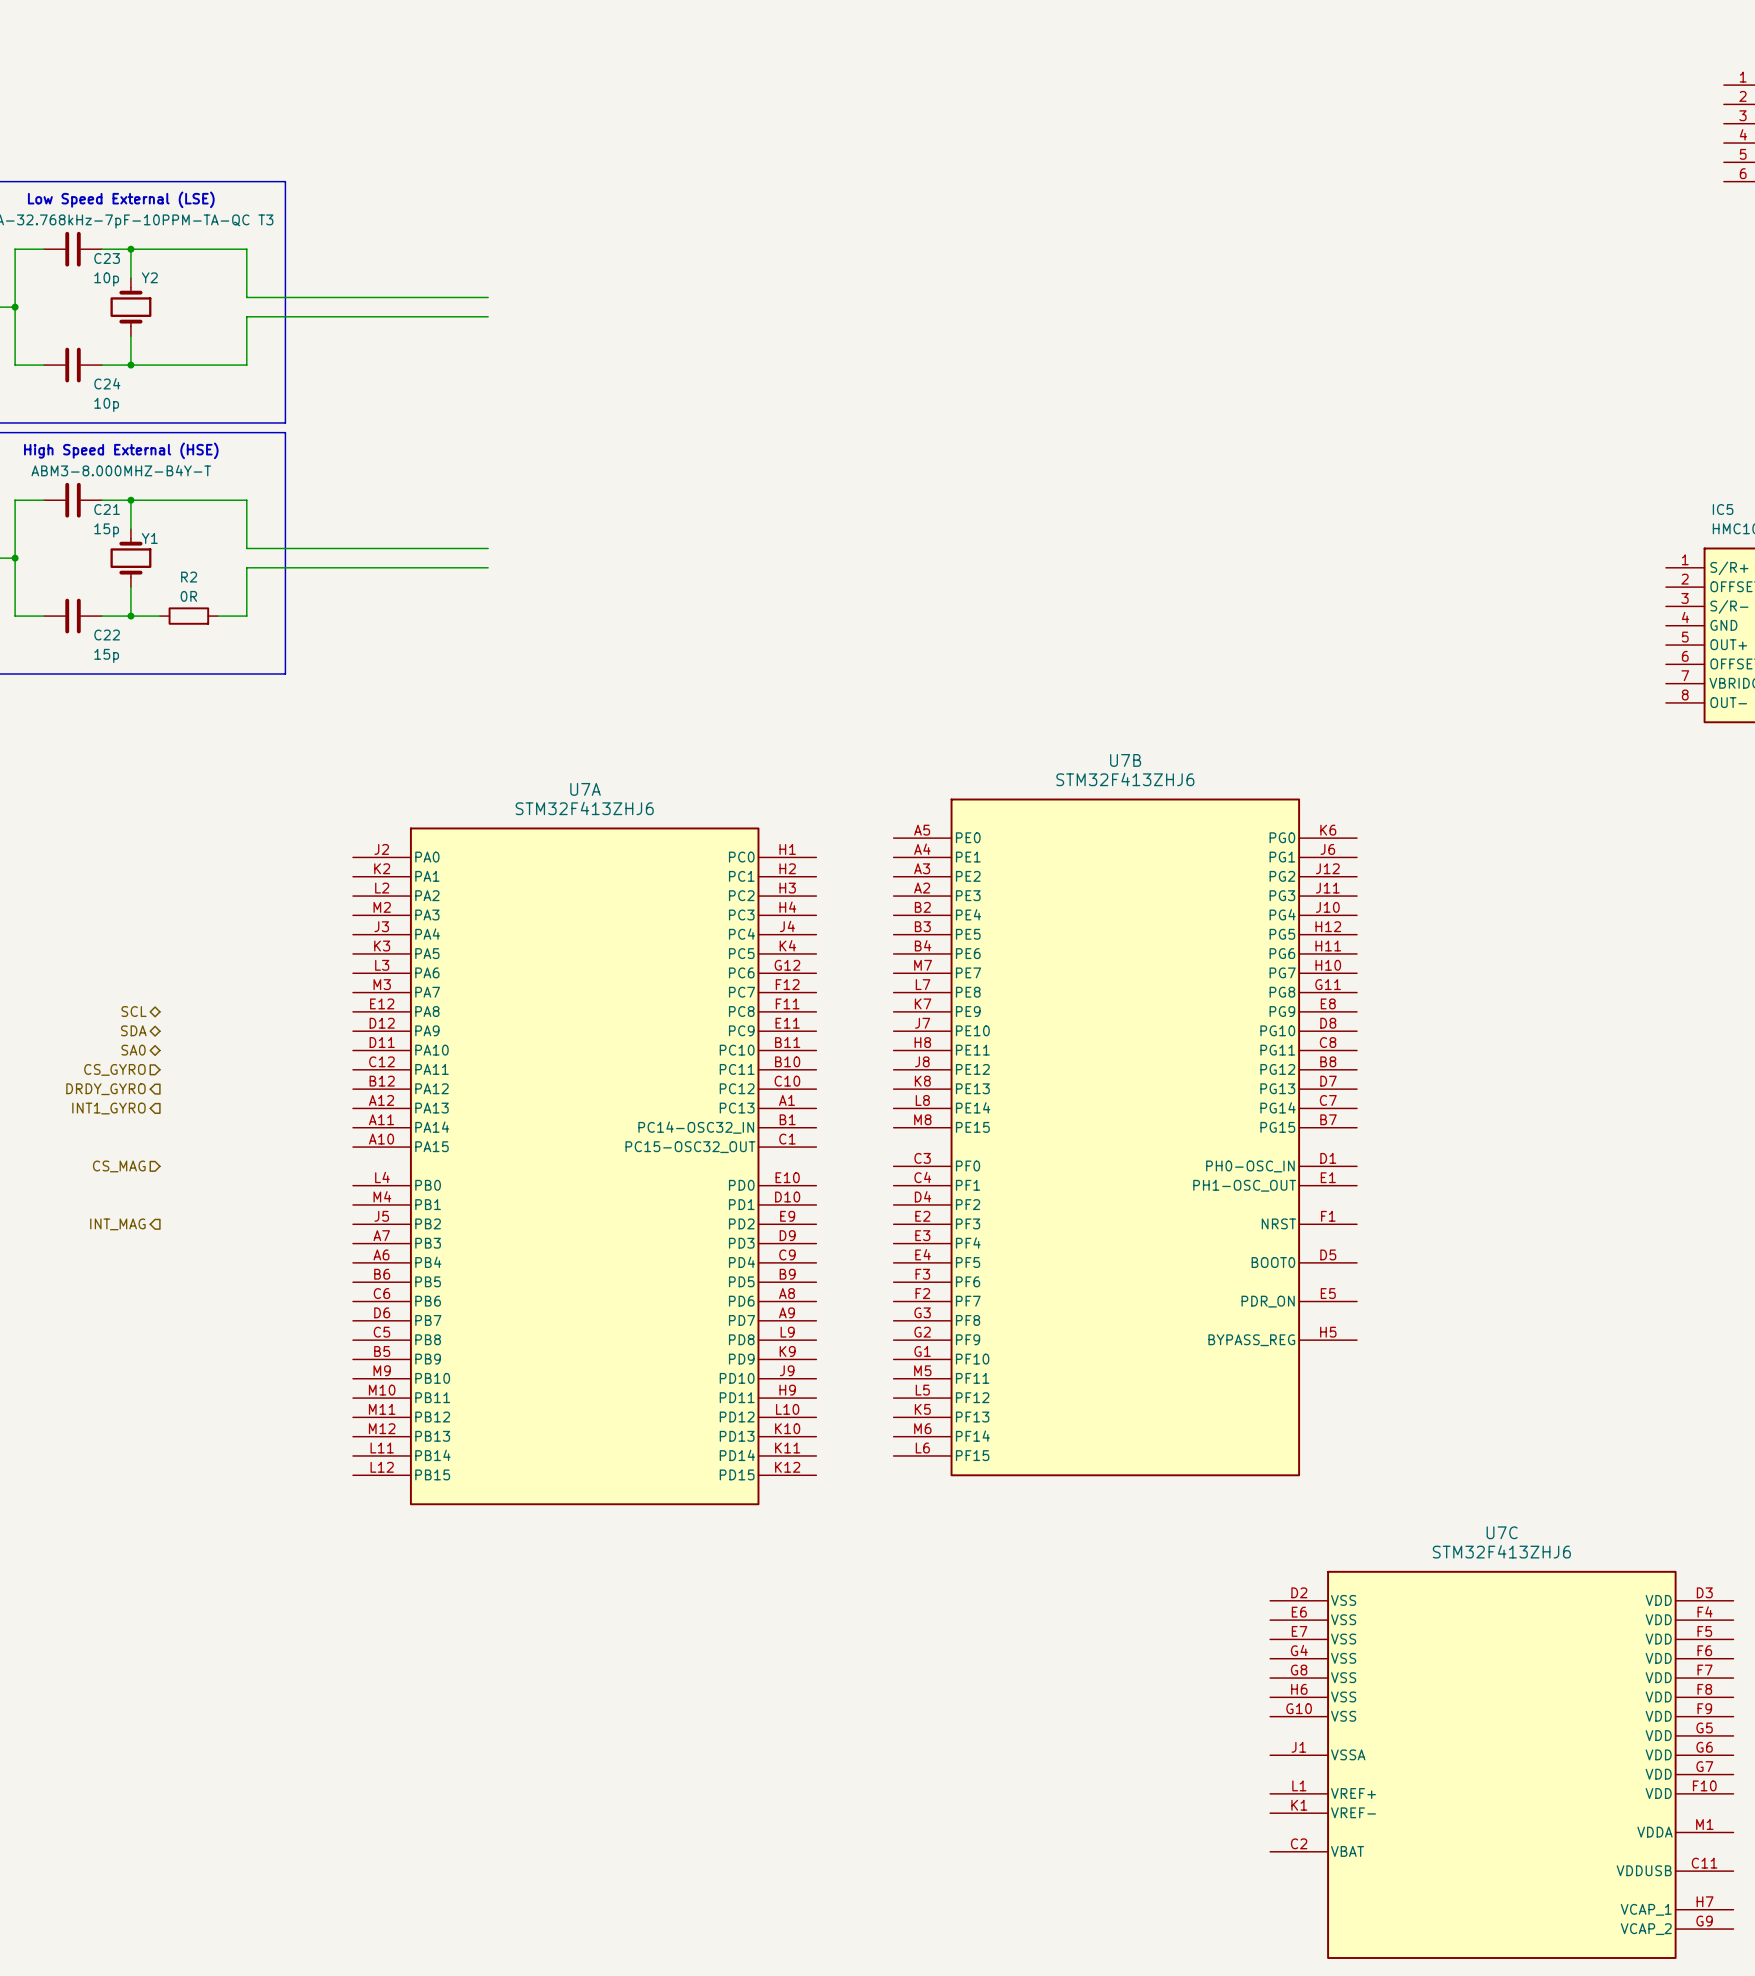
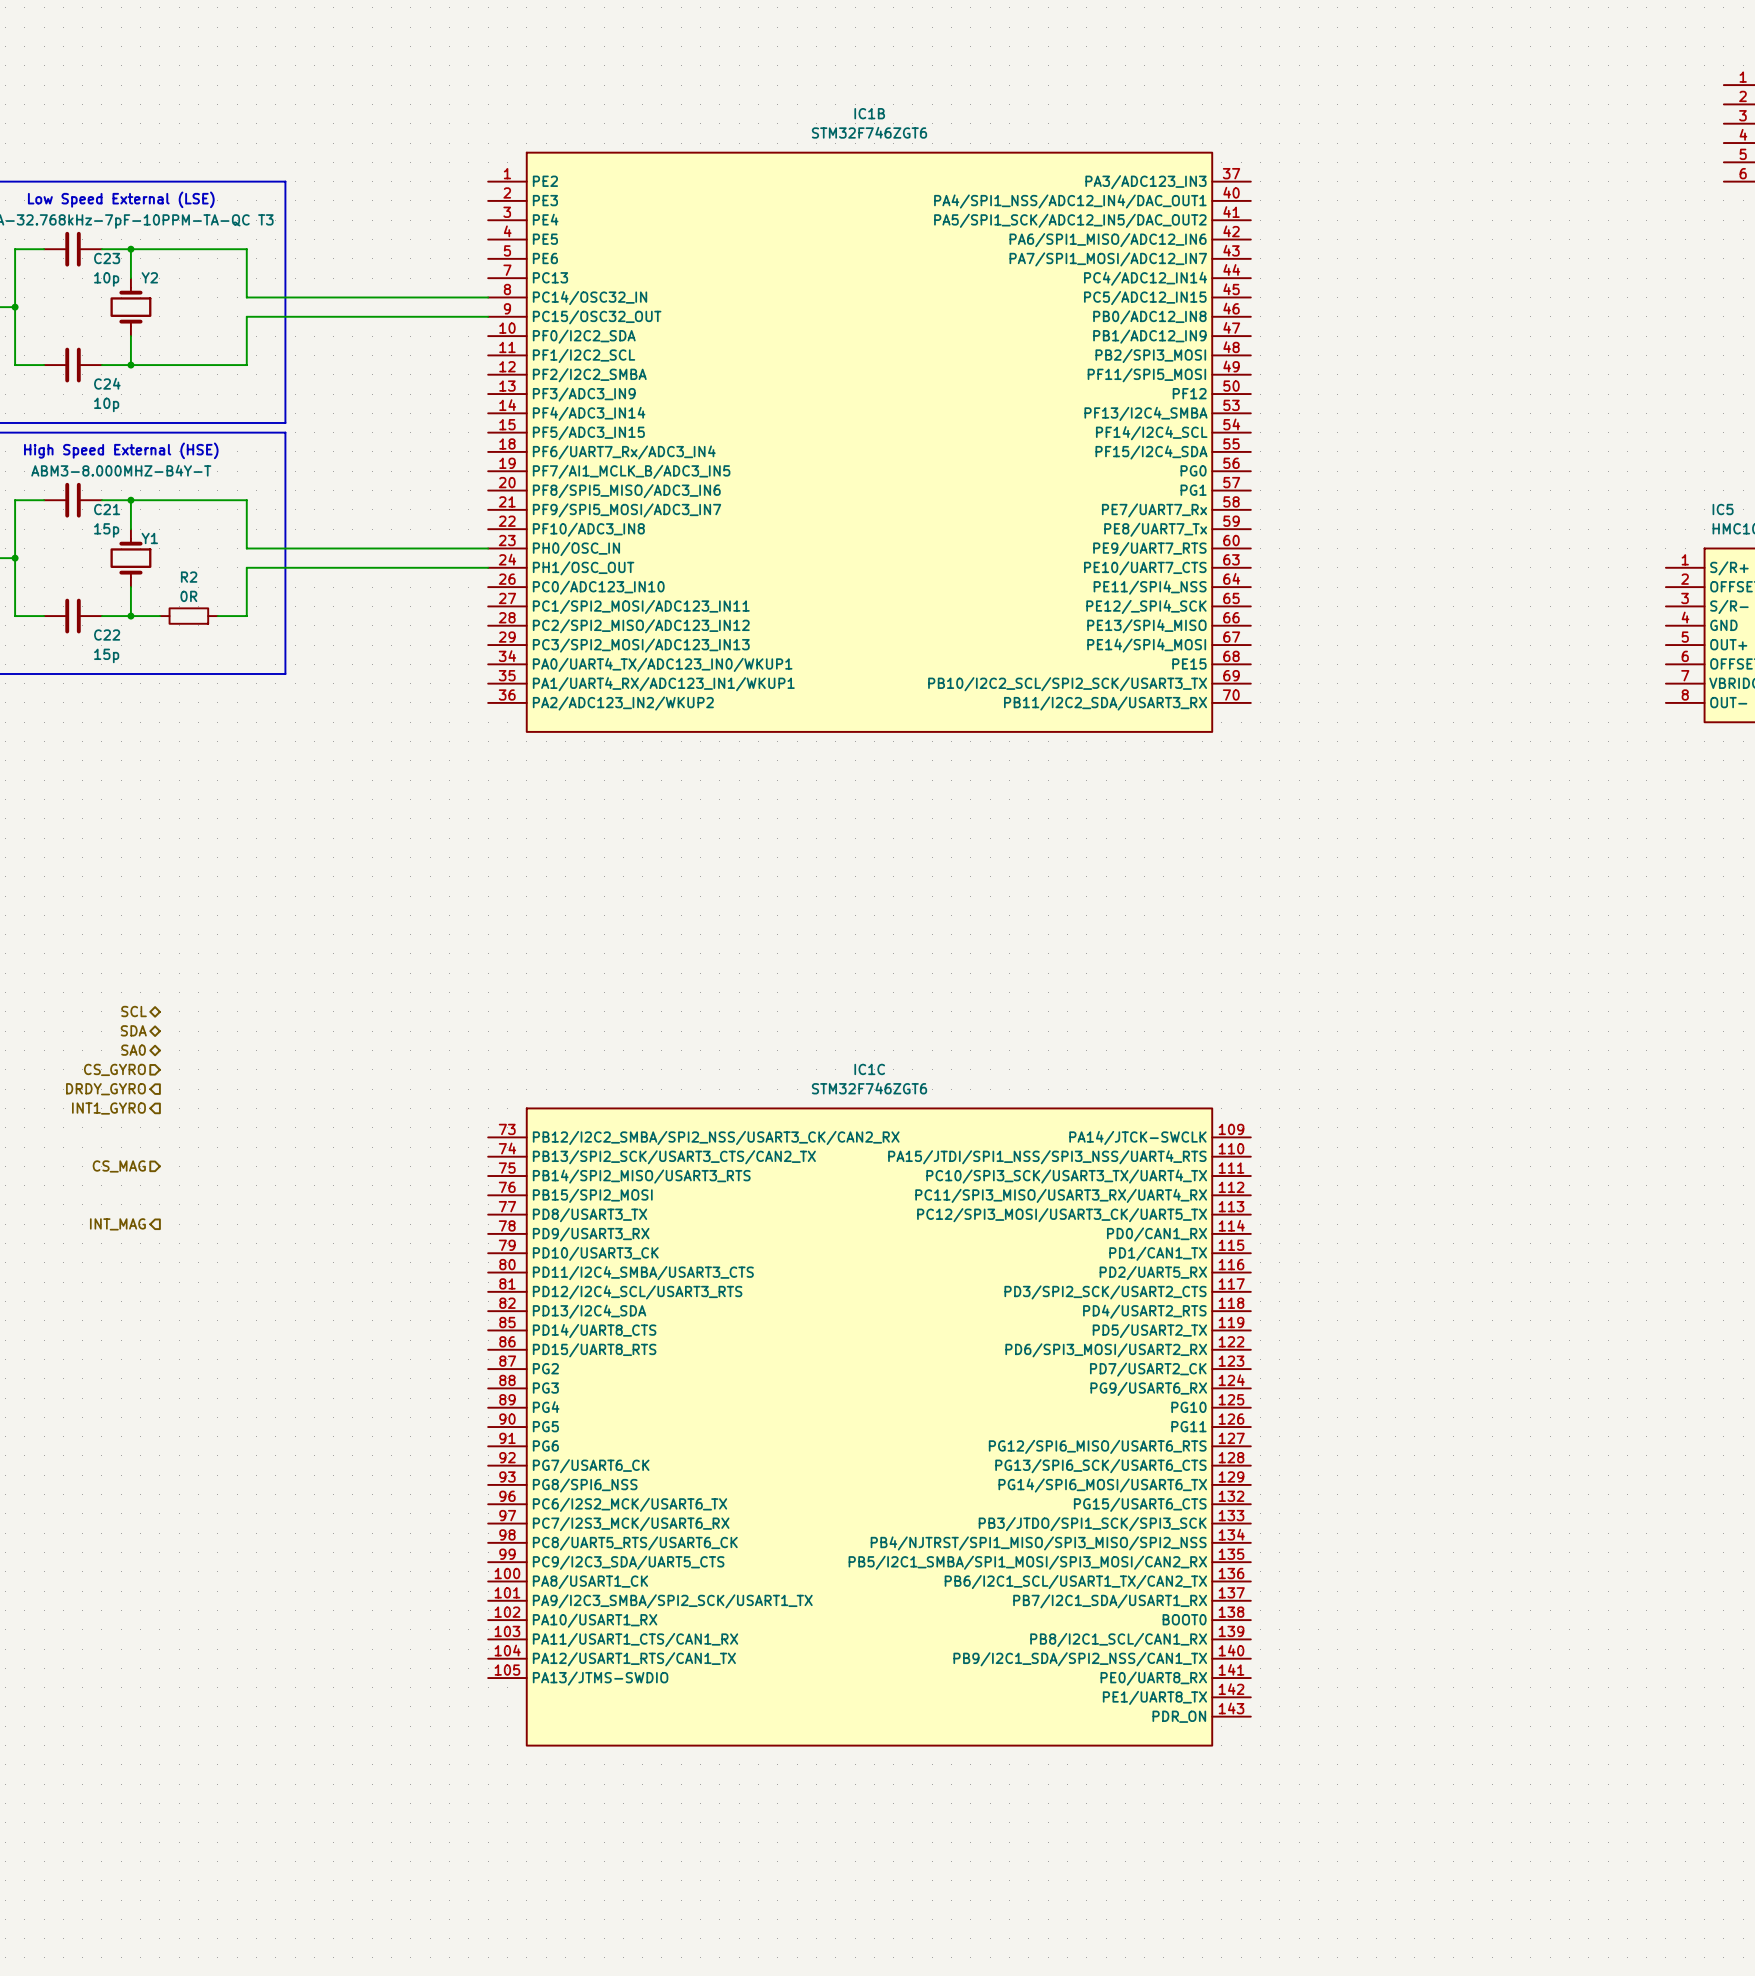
IC1B: none -> STM32F746ZGT6 (869, 442)
U7B: STM32F413ZHJ6 (1125, 1137) -> none
U7A: STM32F413ZHJ6 (584, 1166) -> none
IC1C: none -> STM32F746ZGT6 (869, 1427)
U7C: STM32F413ZHJ6 (1501, 1764) -> none

